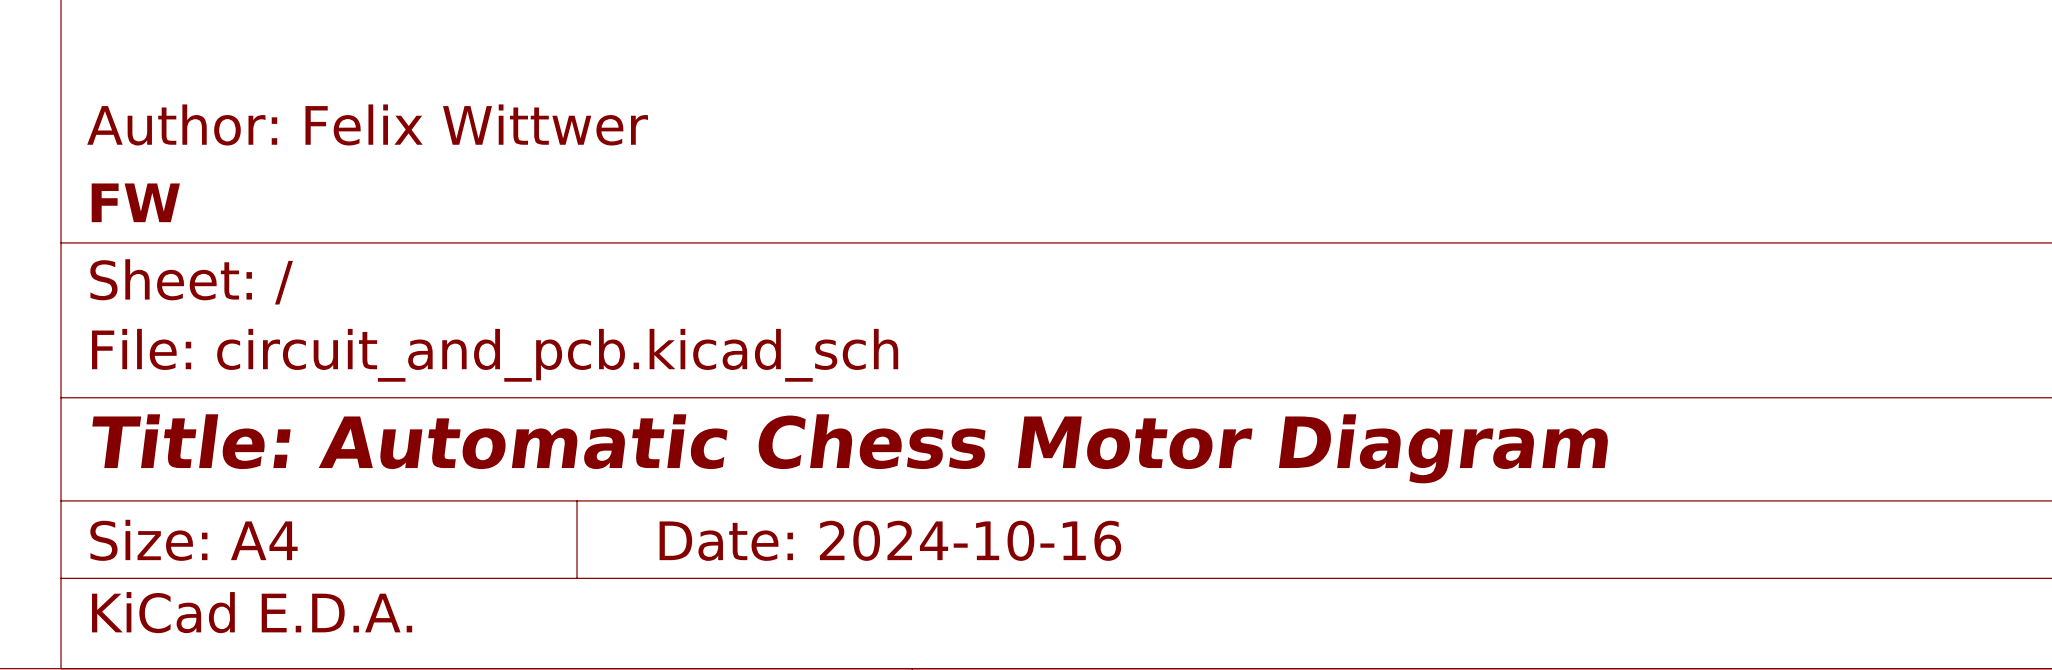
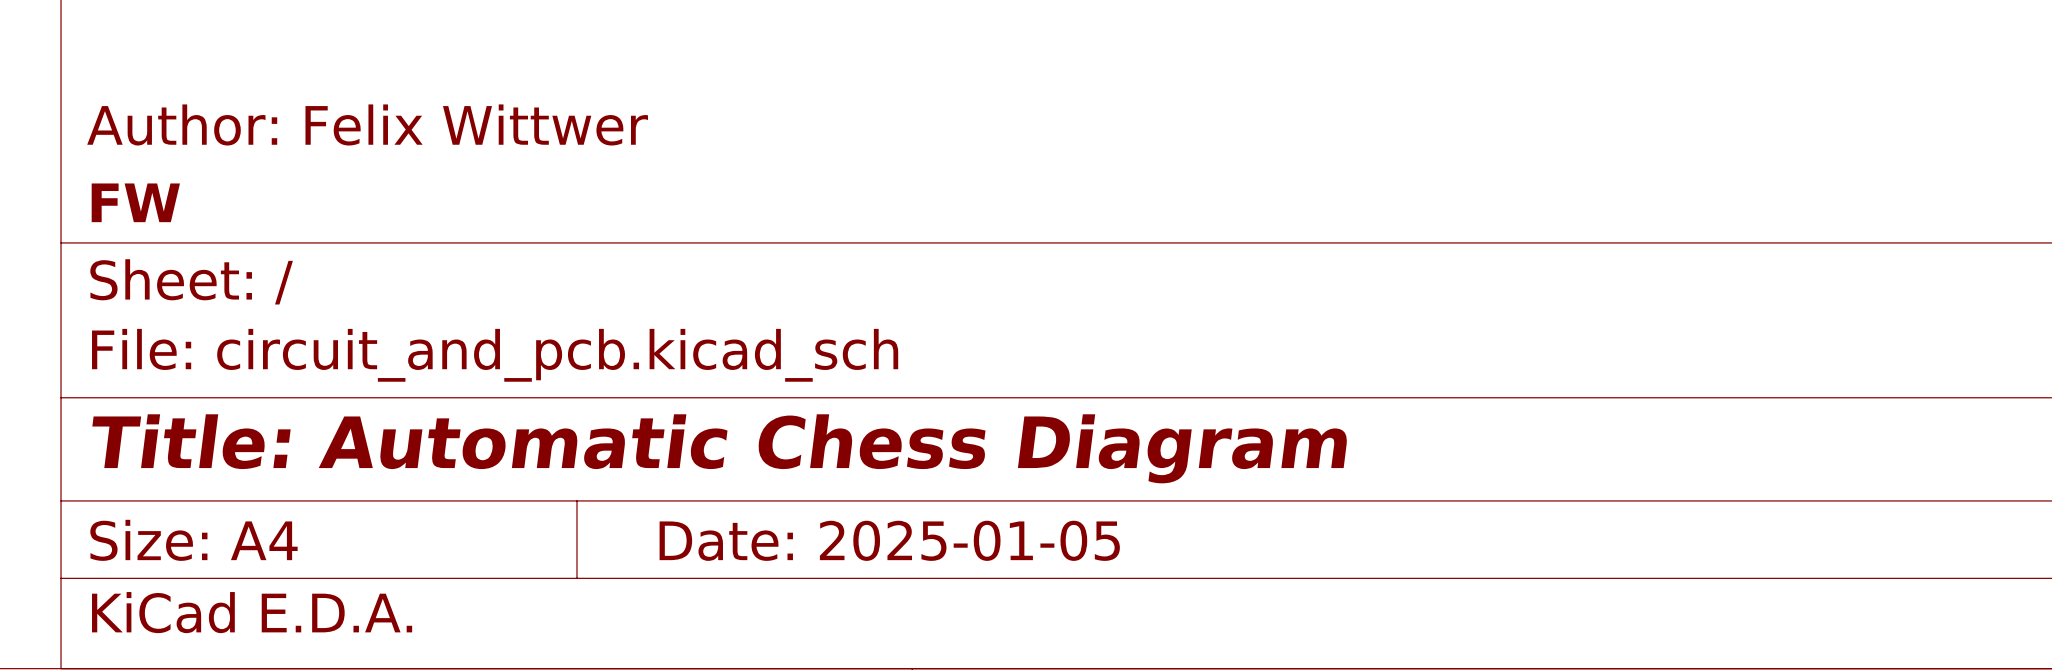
title block: Title: Automatic Chess Motor Diagram (850, 448) -> Title: Automatic Chess Diagram (719, 448)
title block: Date: 2024-10-16 (890, 540) -> Date: 2025-01-05 (889, 540)

